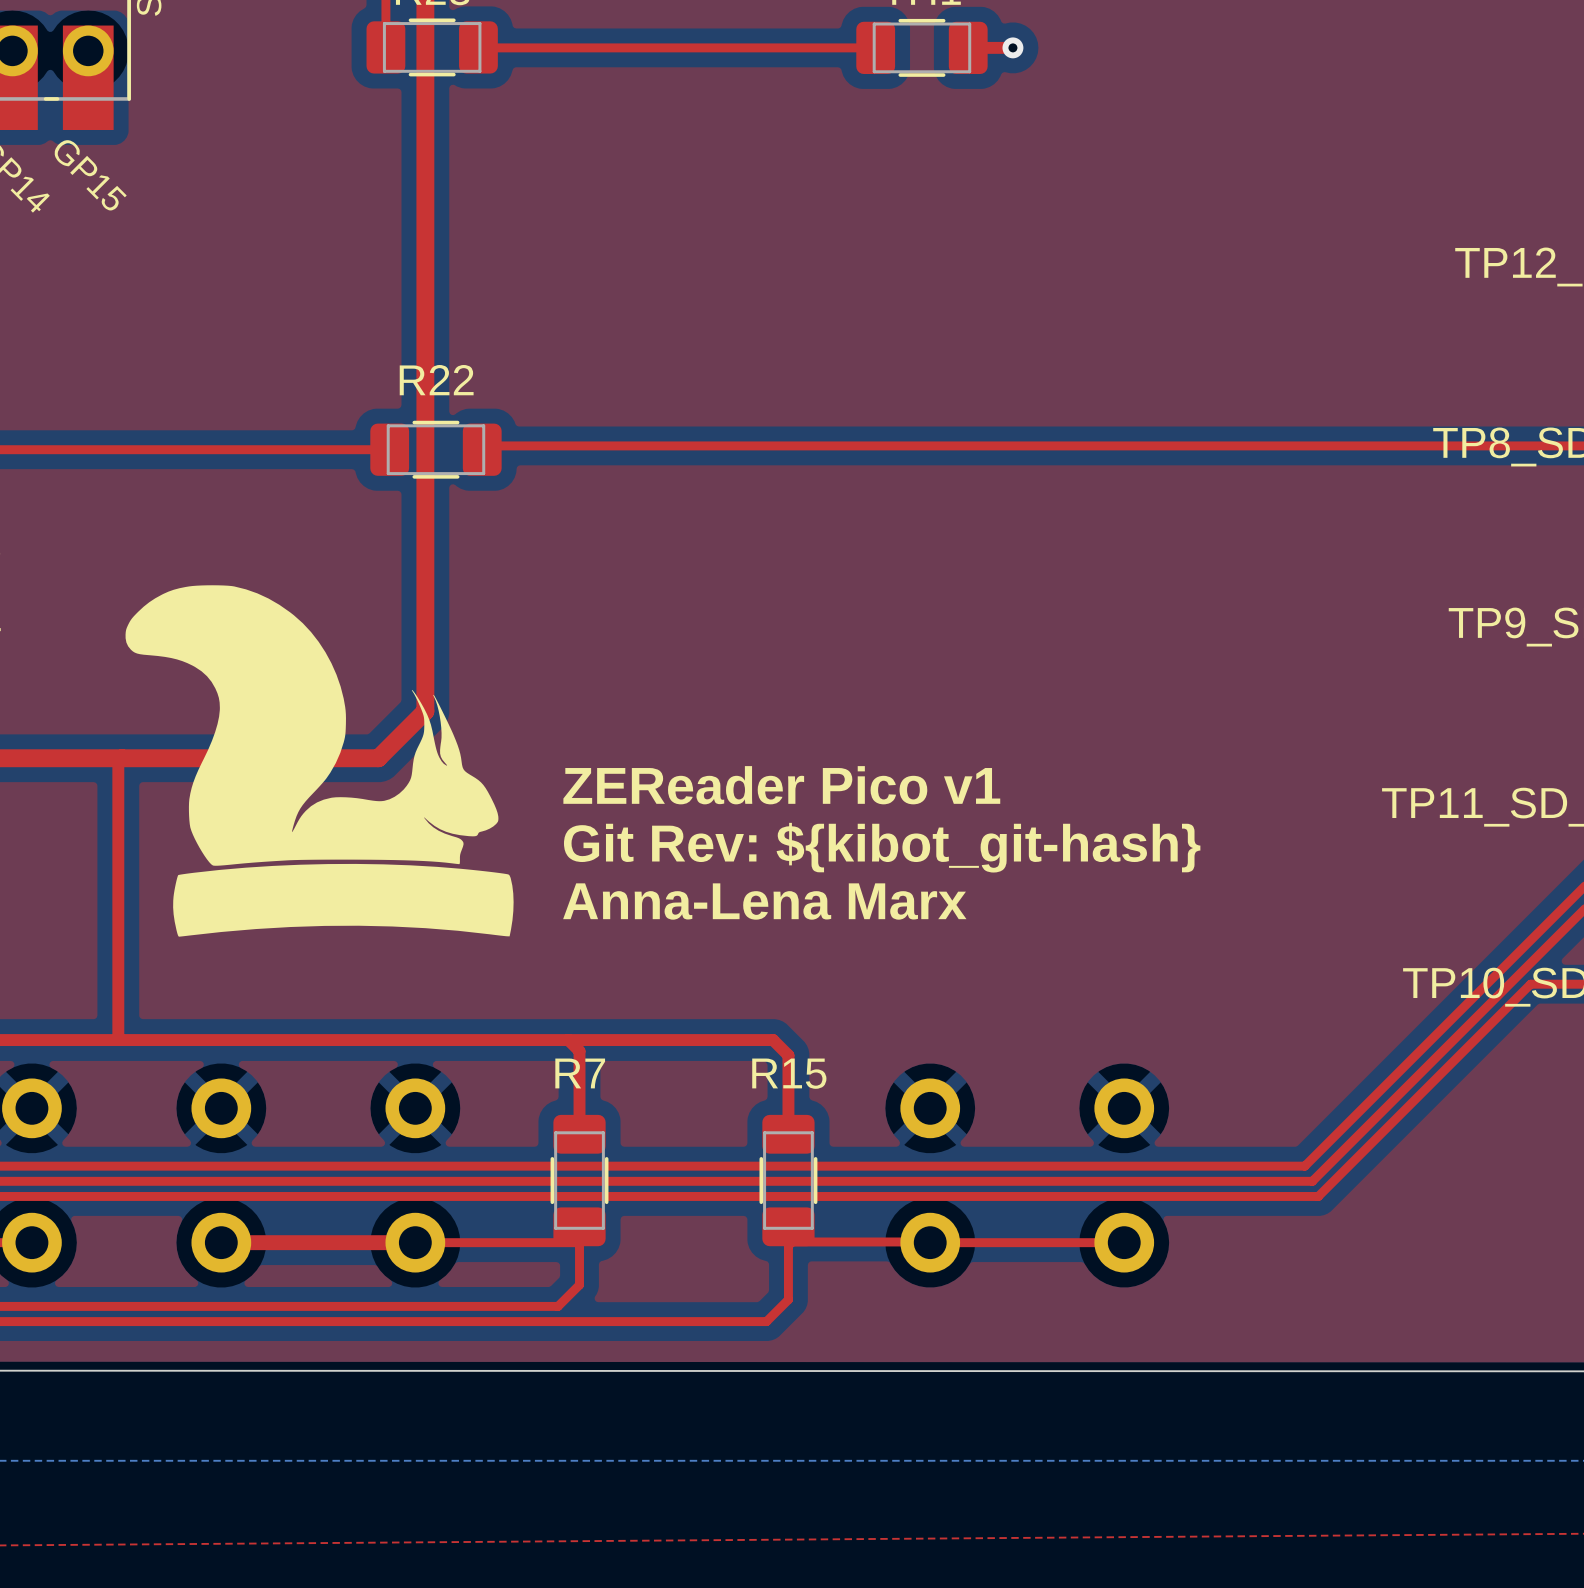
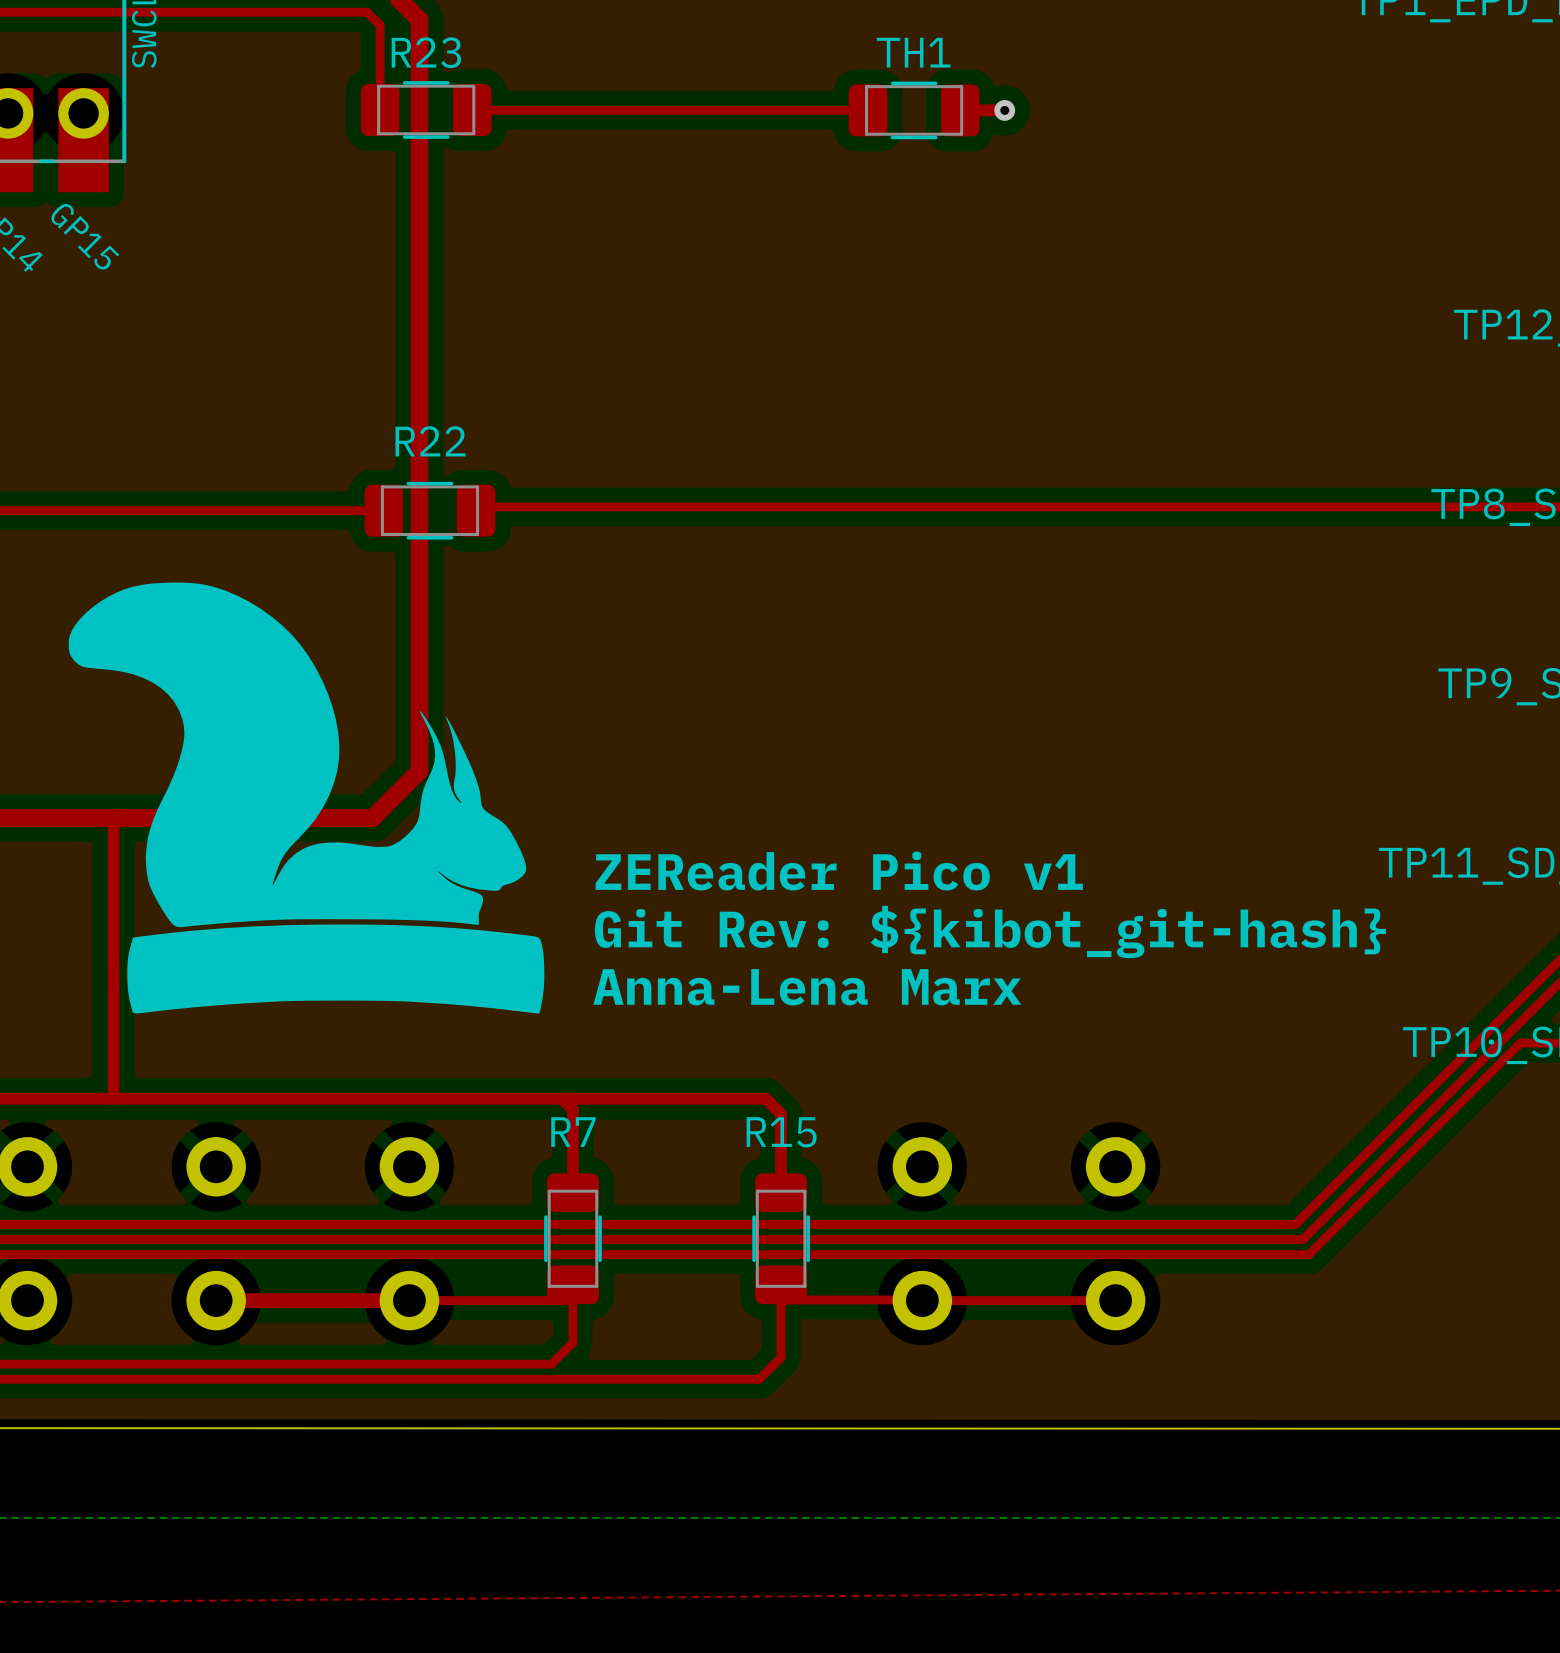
drawing shape: [125, 585, 514, 937] -> [68, 582, 545, 1014]
text position: ZEReader Pico v1 (781, 785) -> ZEReader Pico v1 (839, 871)
text position: Git Rev: ${kibot_git-hash} (882, 847) -> Git Rev: ${kibot_git-hash} (990, 932)
text position: Anna-Lena Marx (764, 901) -> Anna-Lena Marx (807, 987)

